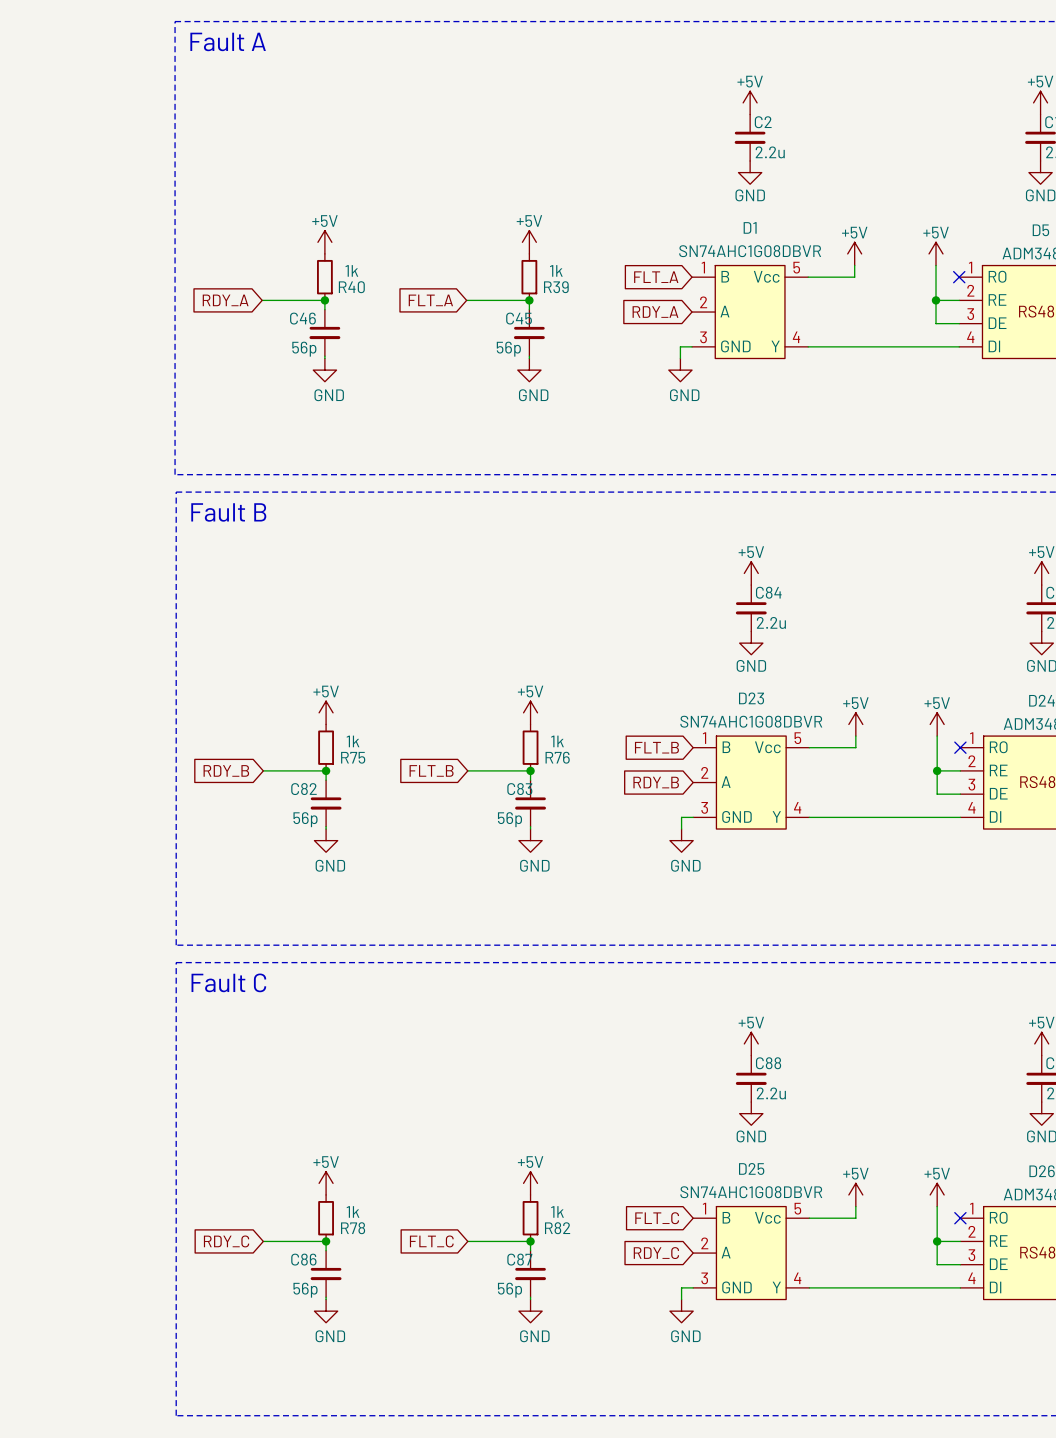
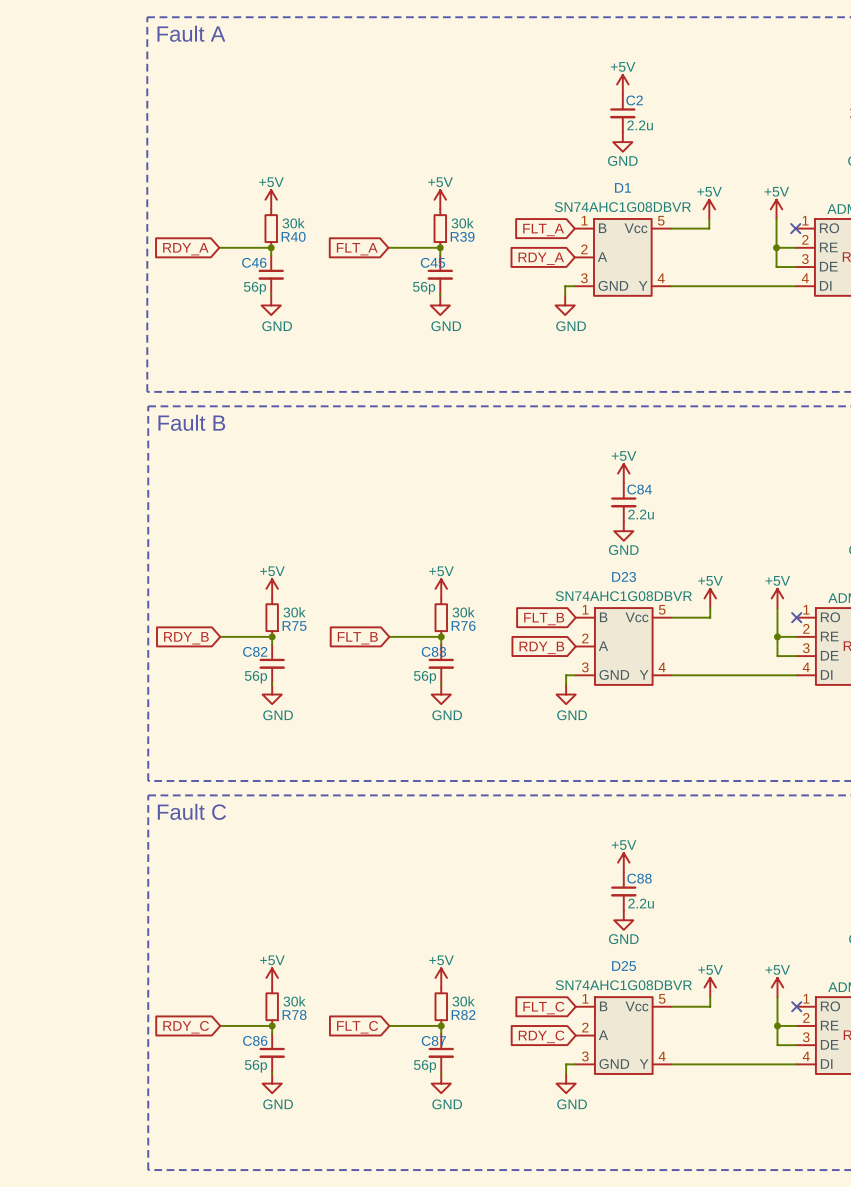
R40 value: 1k (351, 270) -> 30k (293, 223)
R39 value: 1k (556, 270) -> 30k (462, 223)
R75 value: 1k (353, 741) -> 30k (294, 612)
R76 value: 1k (557, 741) -> 30k (463, 612)
R78 value: 1k (353, 1211) -> 30k (294, 1001)
R82 value: 1k (557, 1211) -> 30k (463, 1001)

